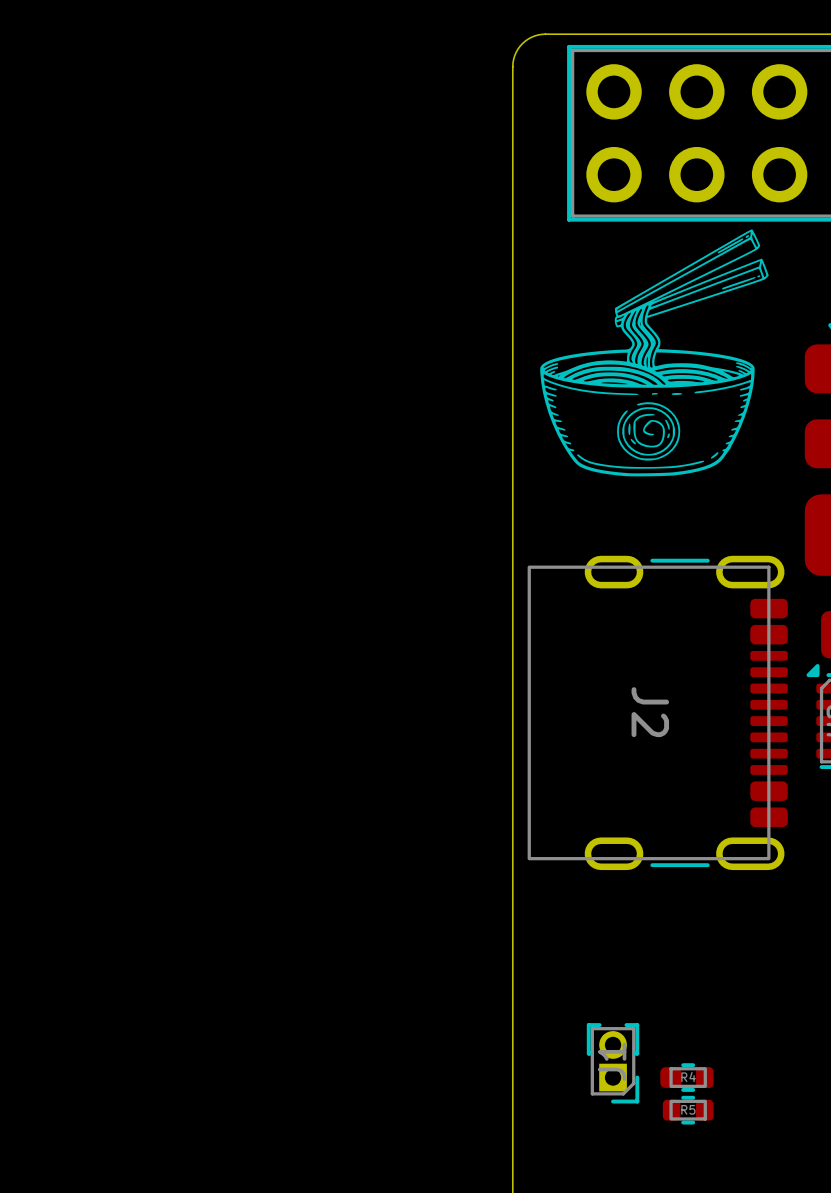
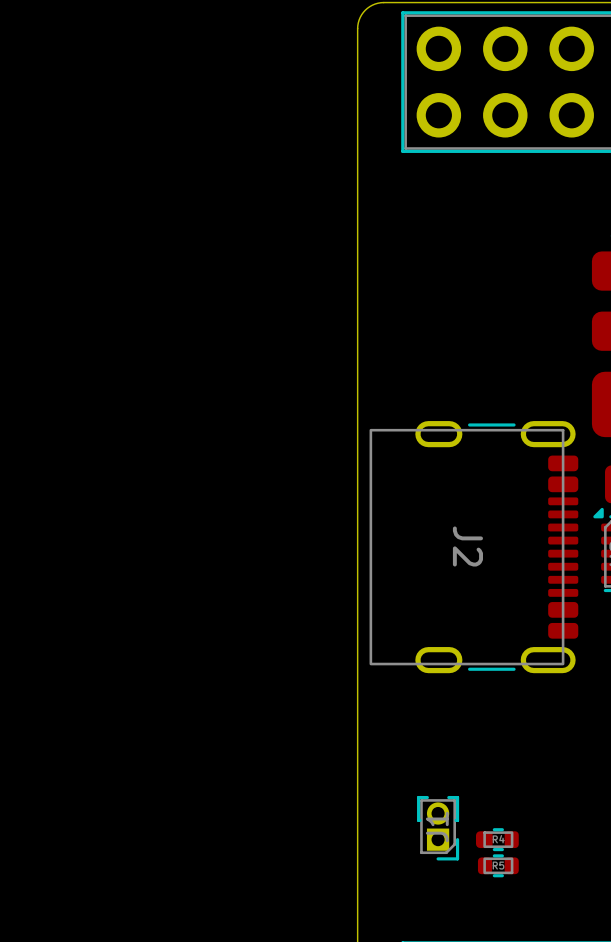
drawing: [540, 229, 769, 477] -> none

